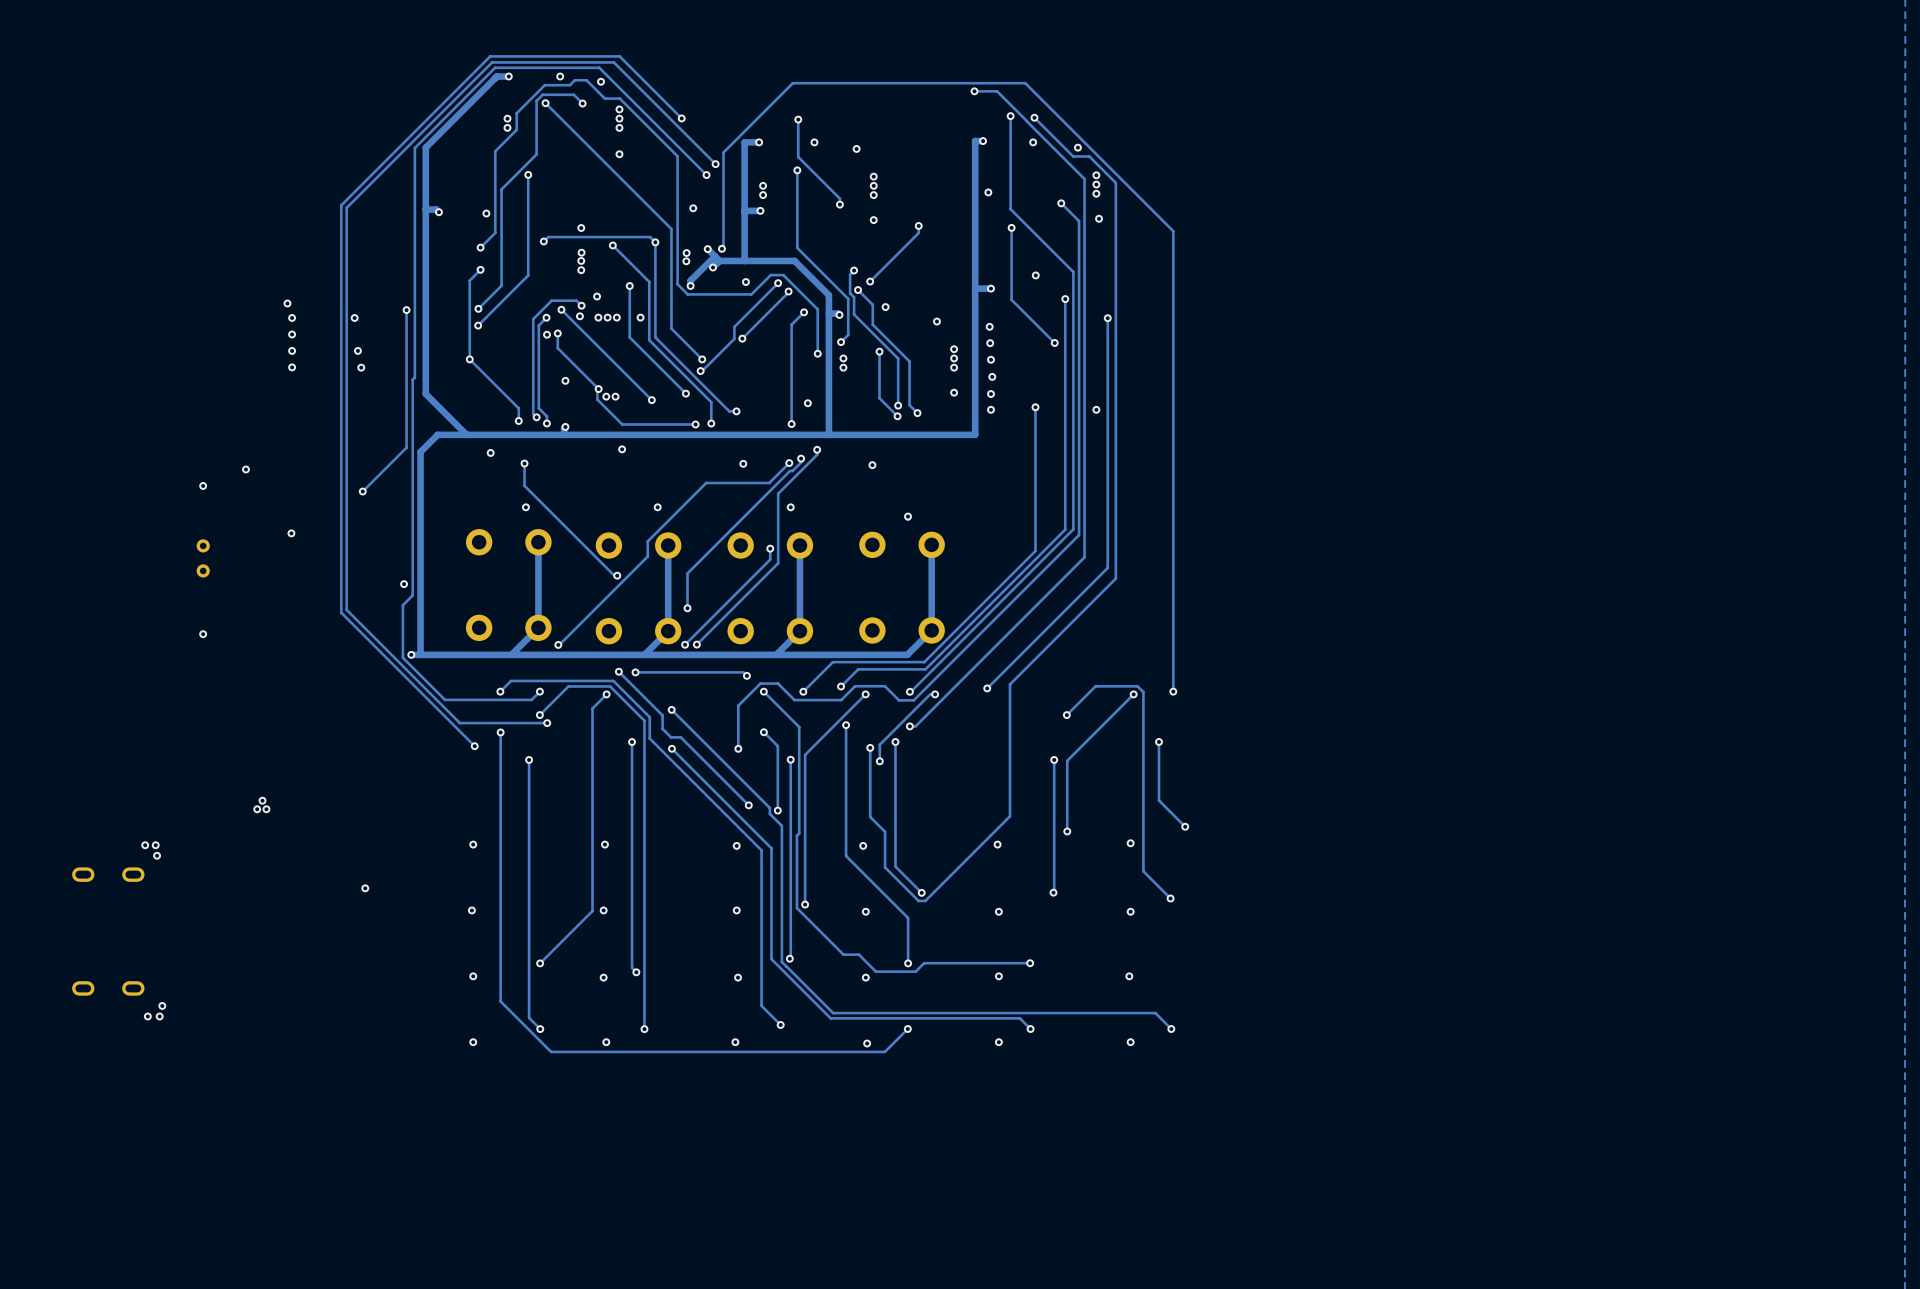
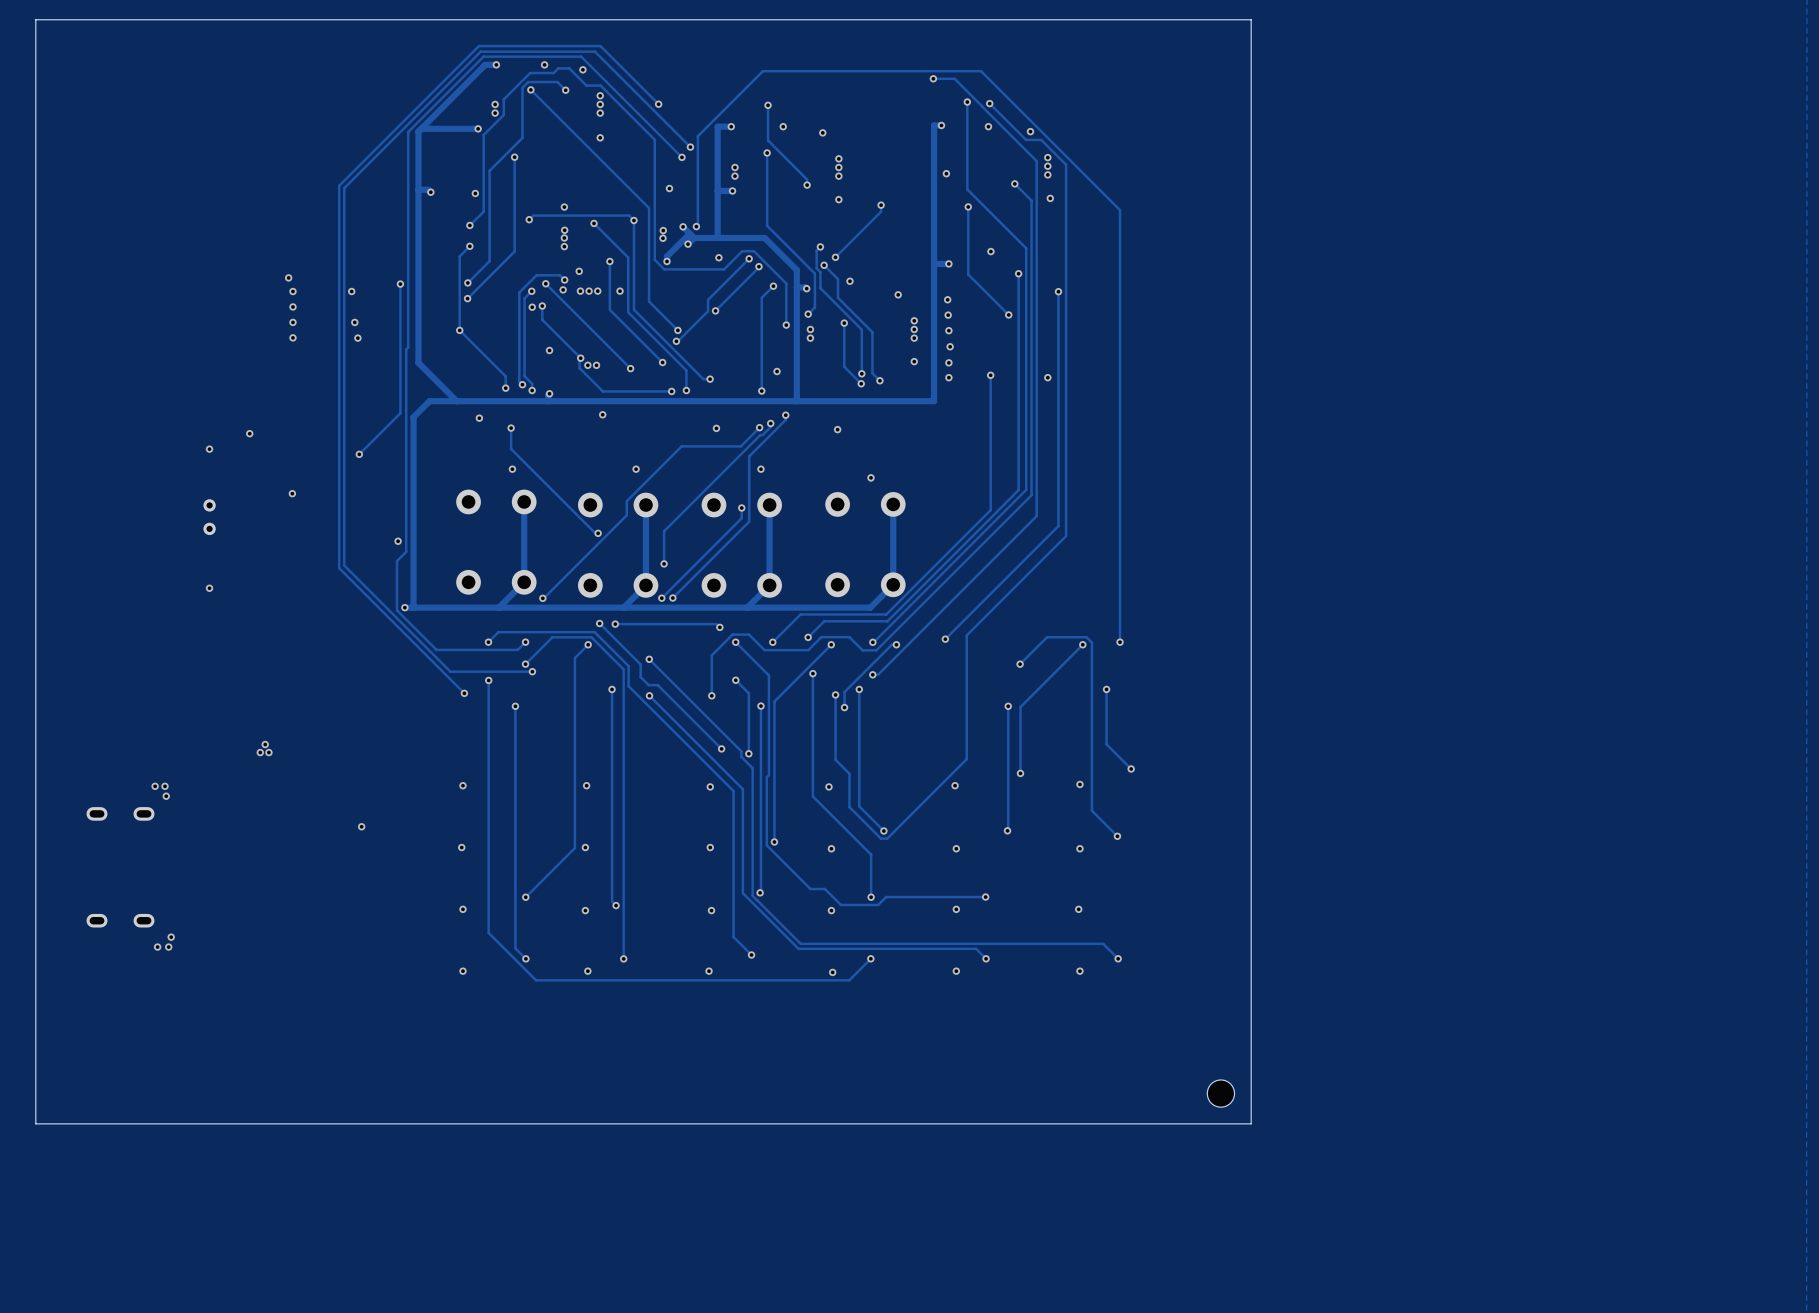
board edge: none -> (1251, 19) (35, 19) (35, 1123) (1251, 1123) (1251, 19)
track: none -> (478, 128) (421, 128)
via: none -> (478, 128)
part: none -> (1220, 1093)

